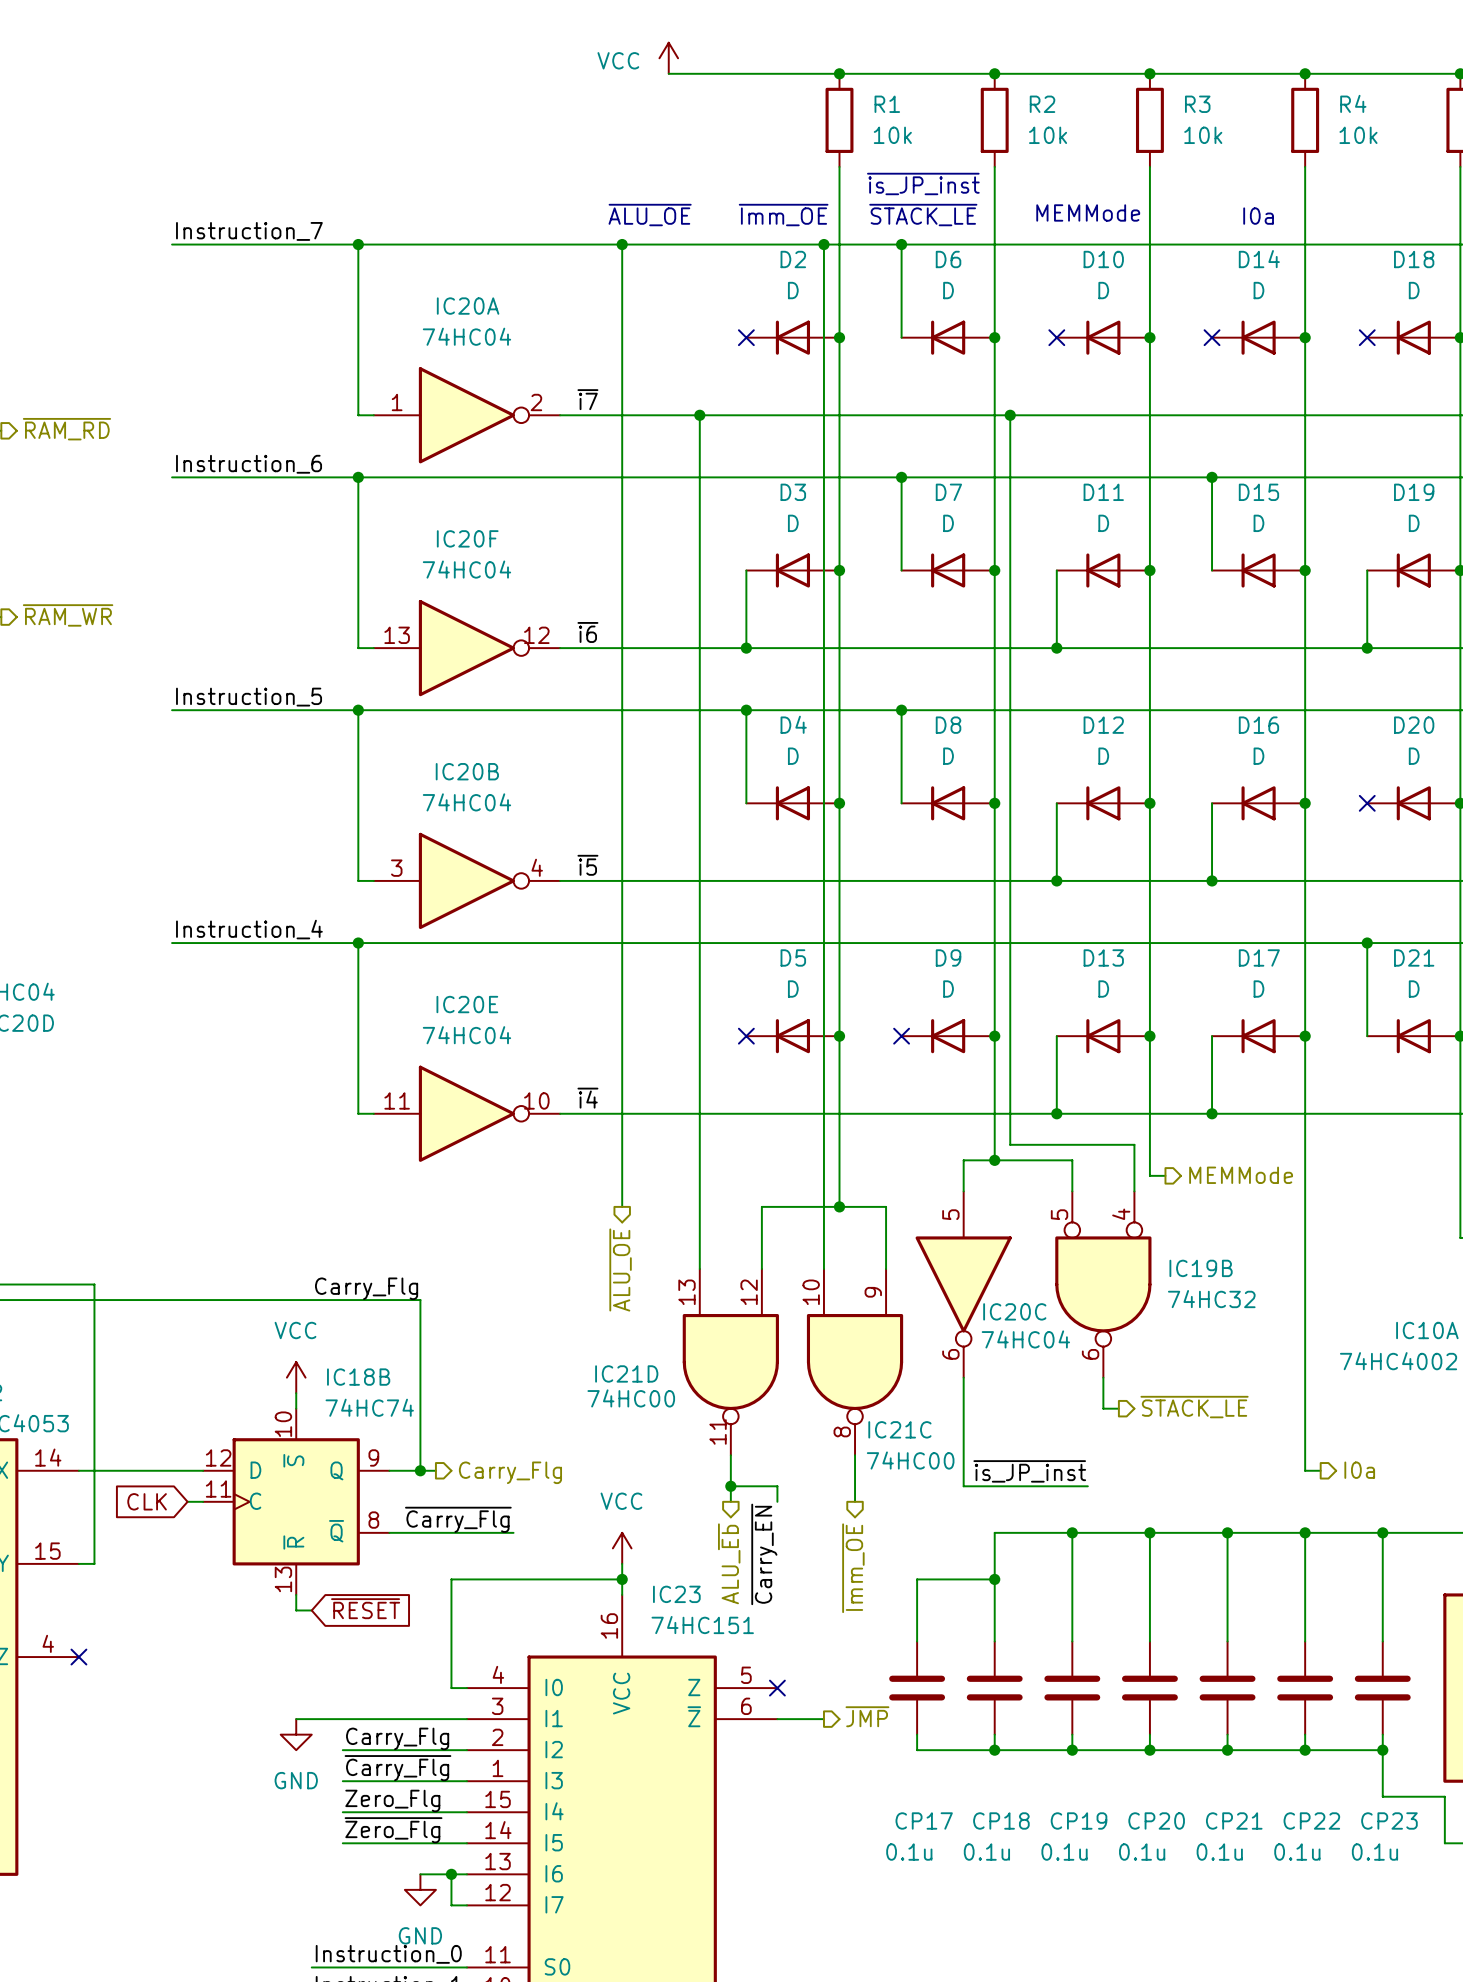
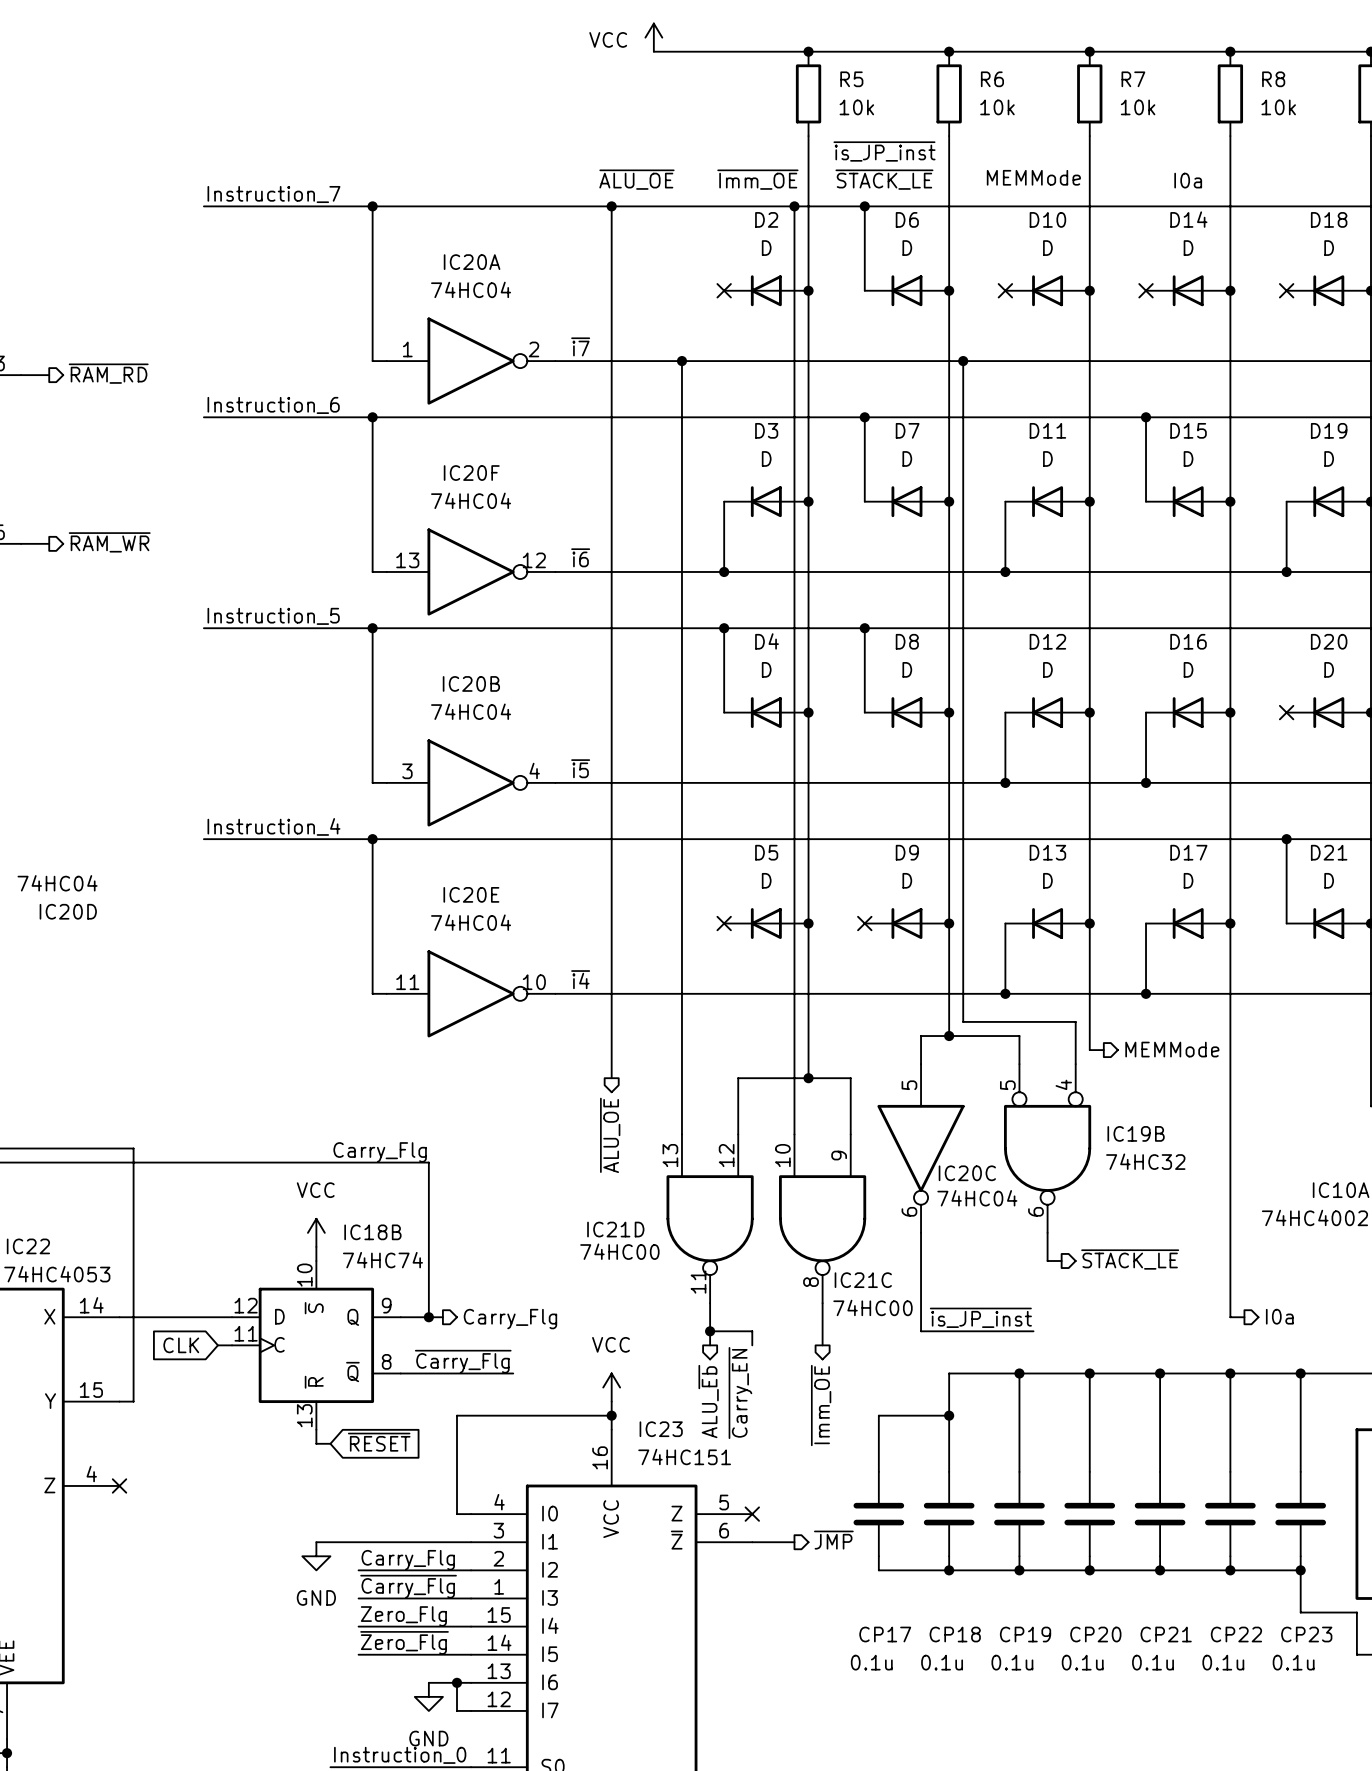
R4 name: R4 (1353, 103) -> R8 (1273, 79)
R1 name: R1 (887, 104) -> R5 (851, 79)
R2 name: R2 (1042, 104) -> R6 (992, 79)
R3 name: R3 (1197, 104) -> R7 (1133, 79)

